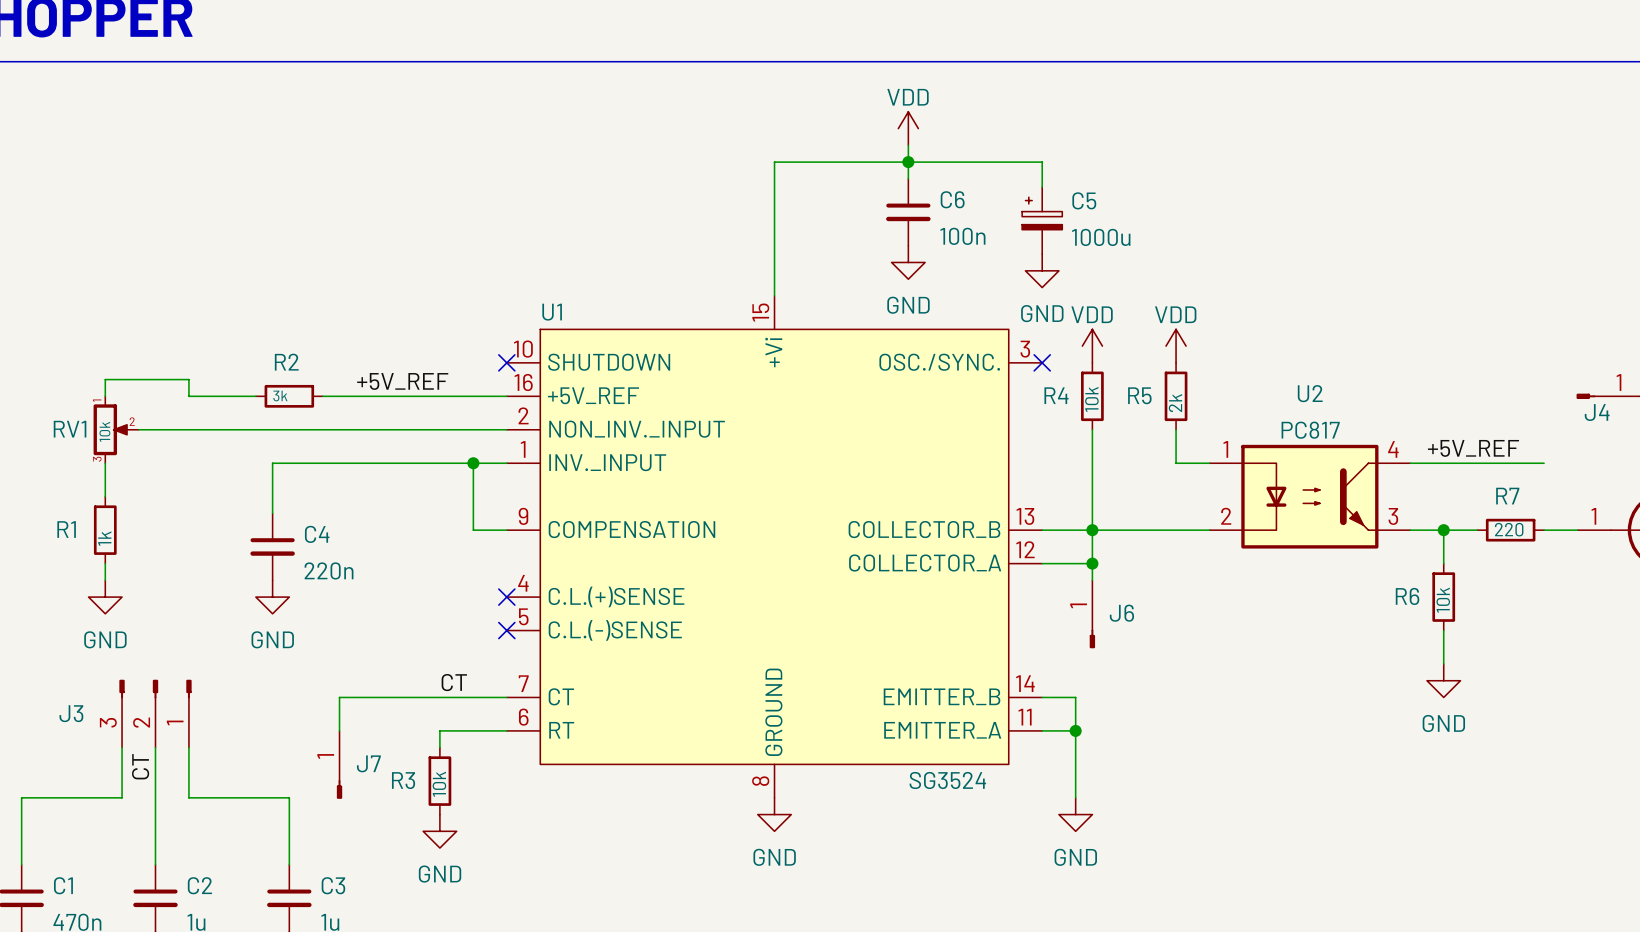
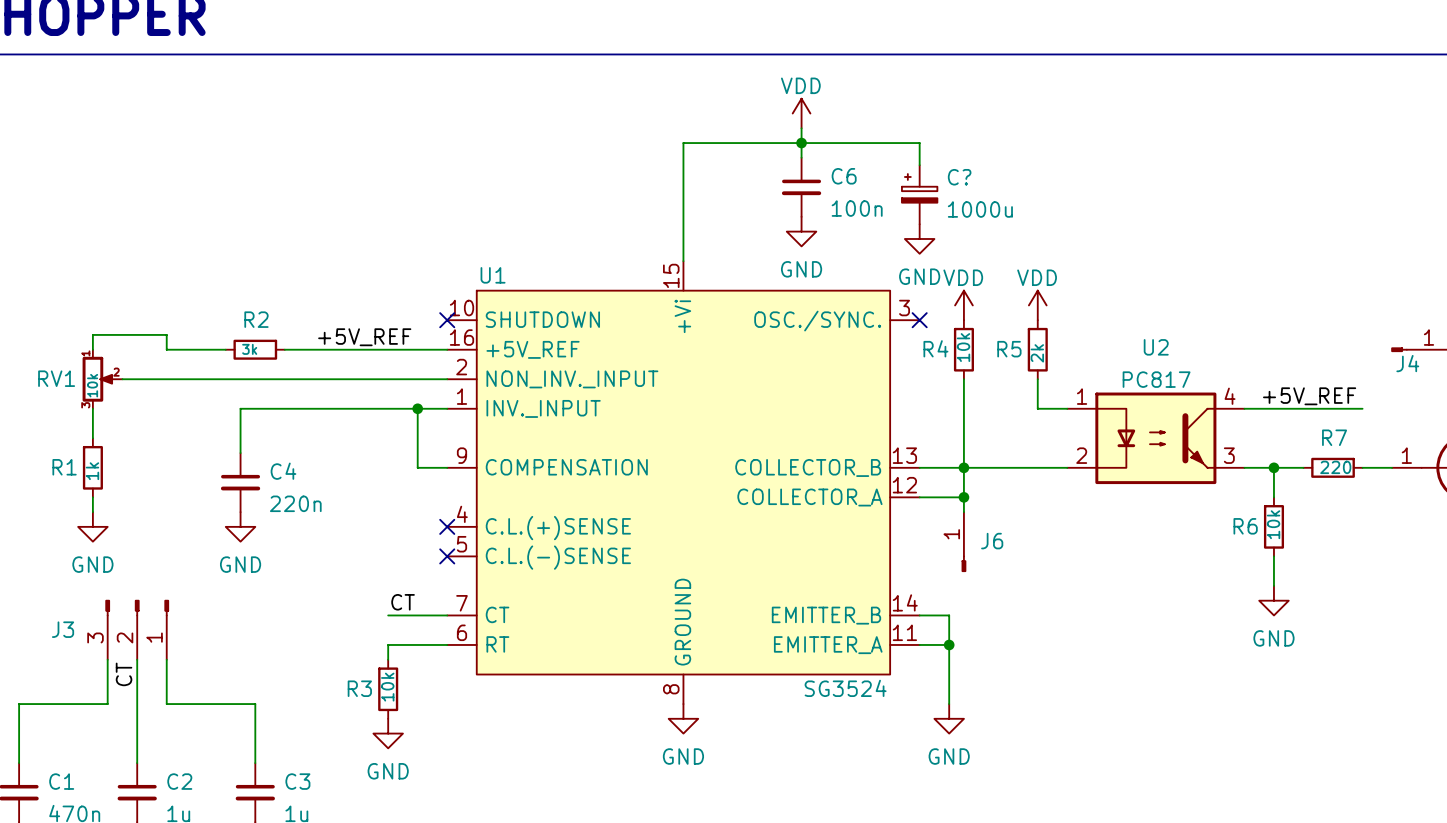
C5 name: C5 (1084, 200) -> C? (959, 177)
wire: (439, 697) (339, 697) (339, 730) -> none
J7: (339, 764) -> none

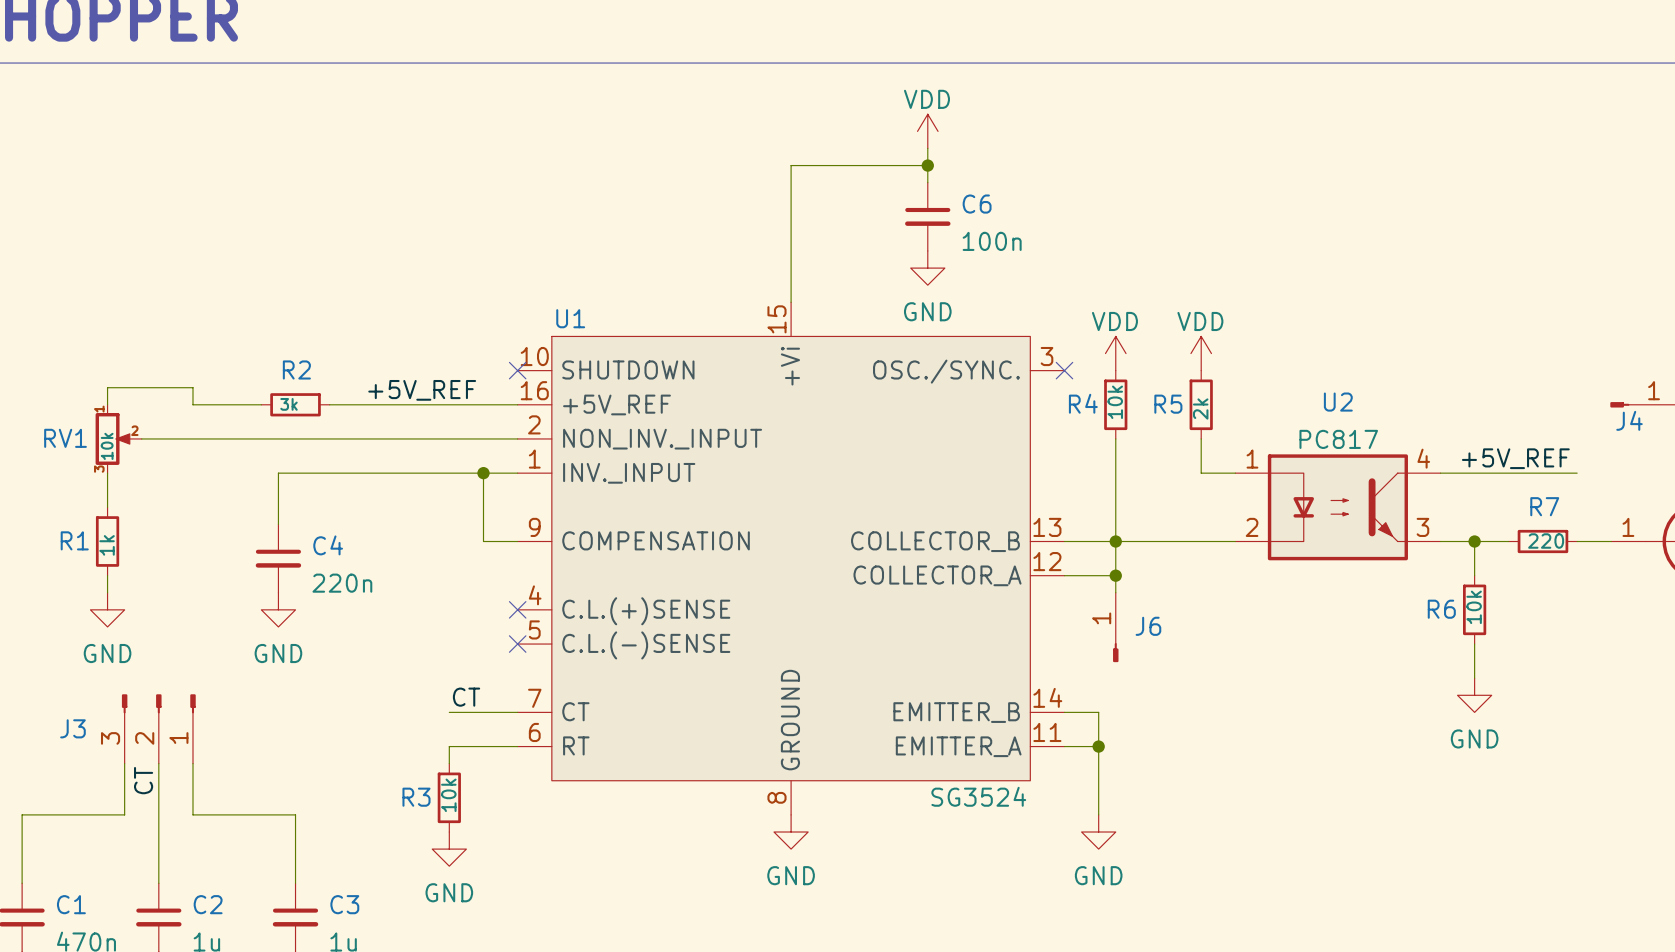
wire: (801, 143) (919, 143) (919, 165) -> none
C?: 1000u (919, 194) -> none
power symbol: GND (919, 238) -> none

